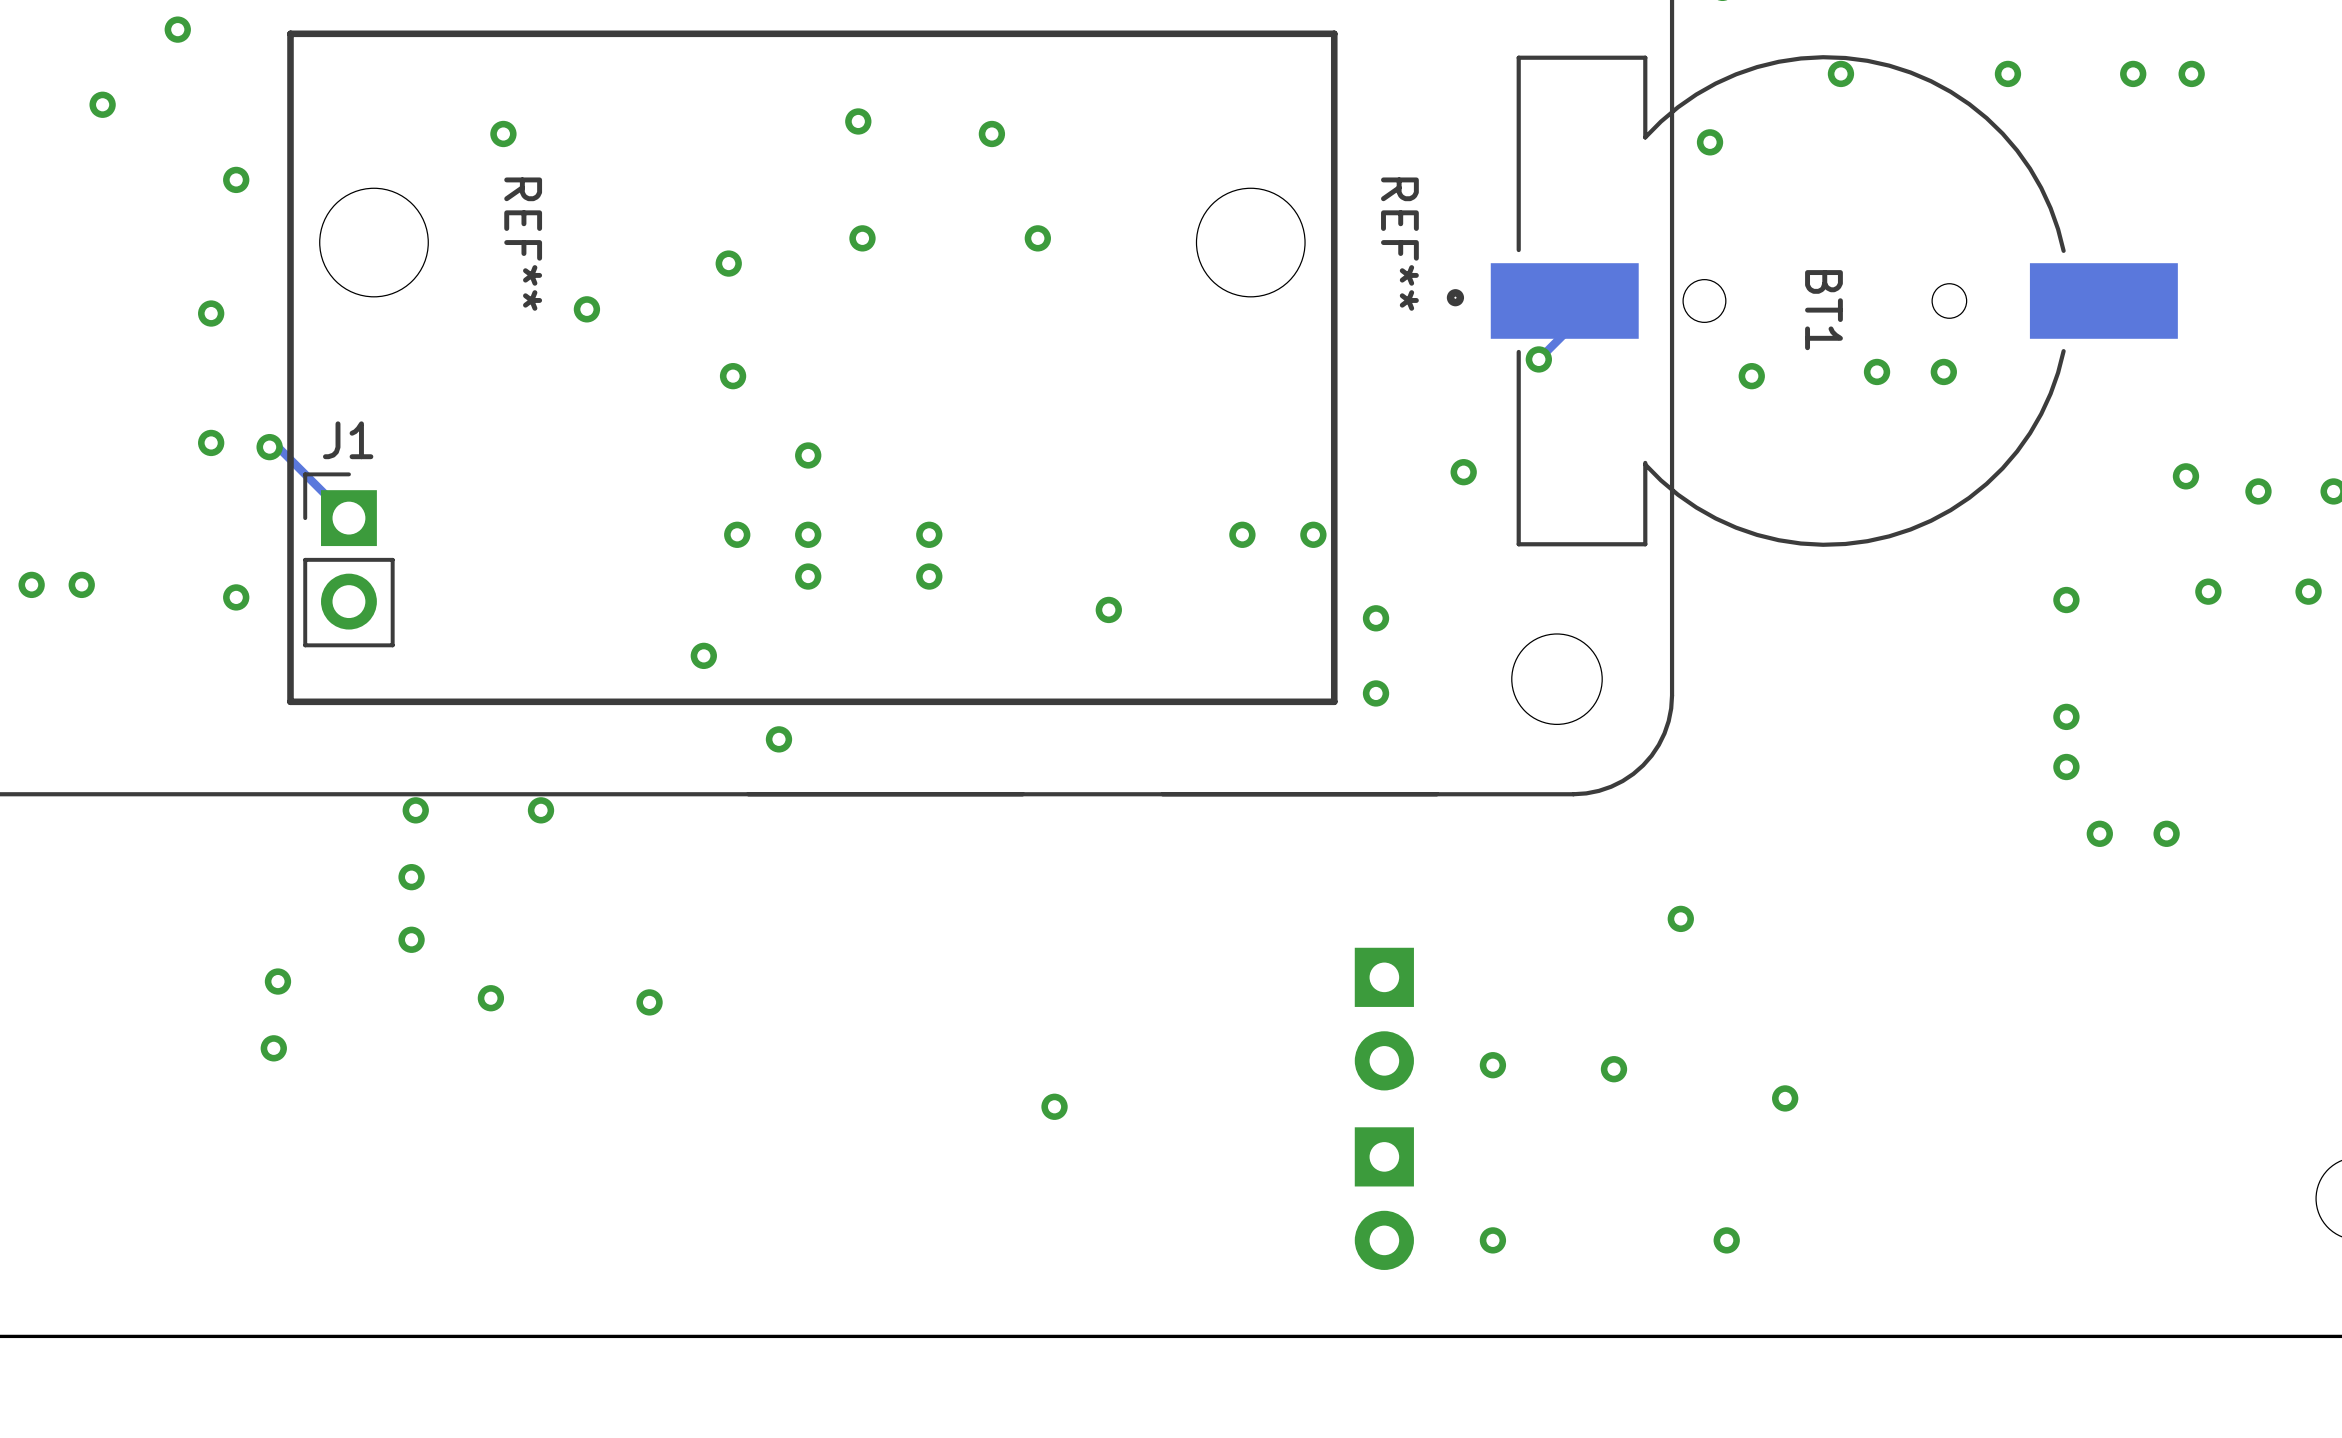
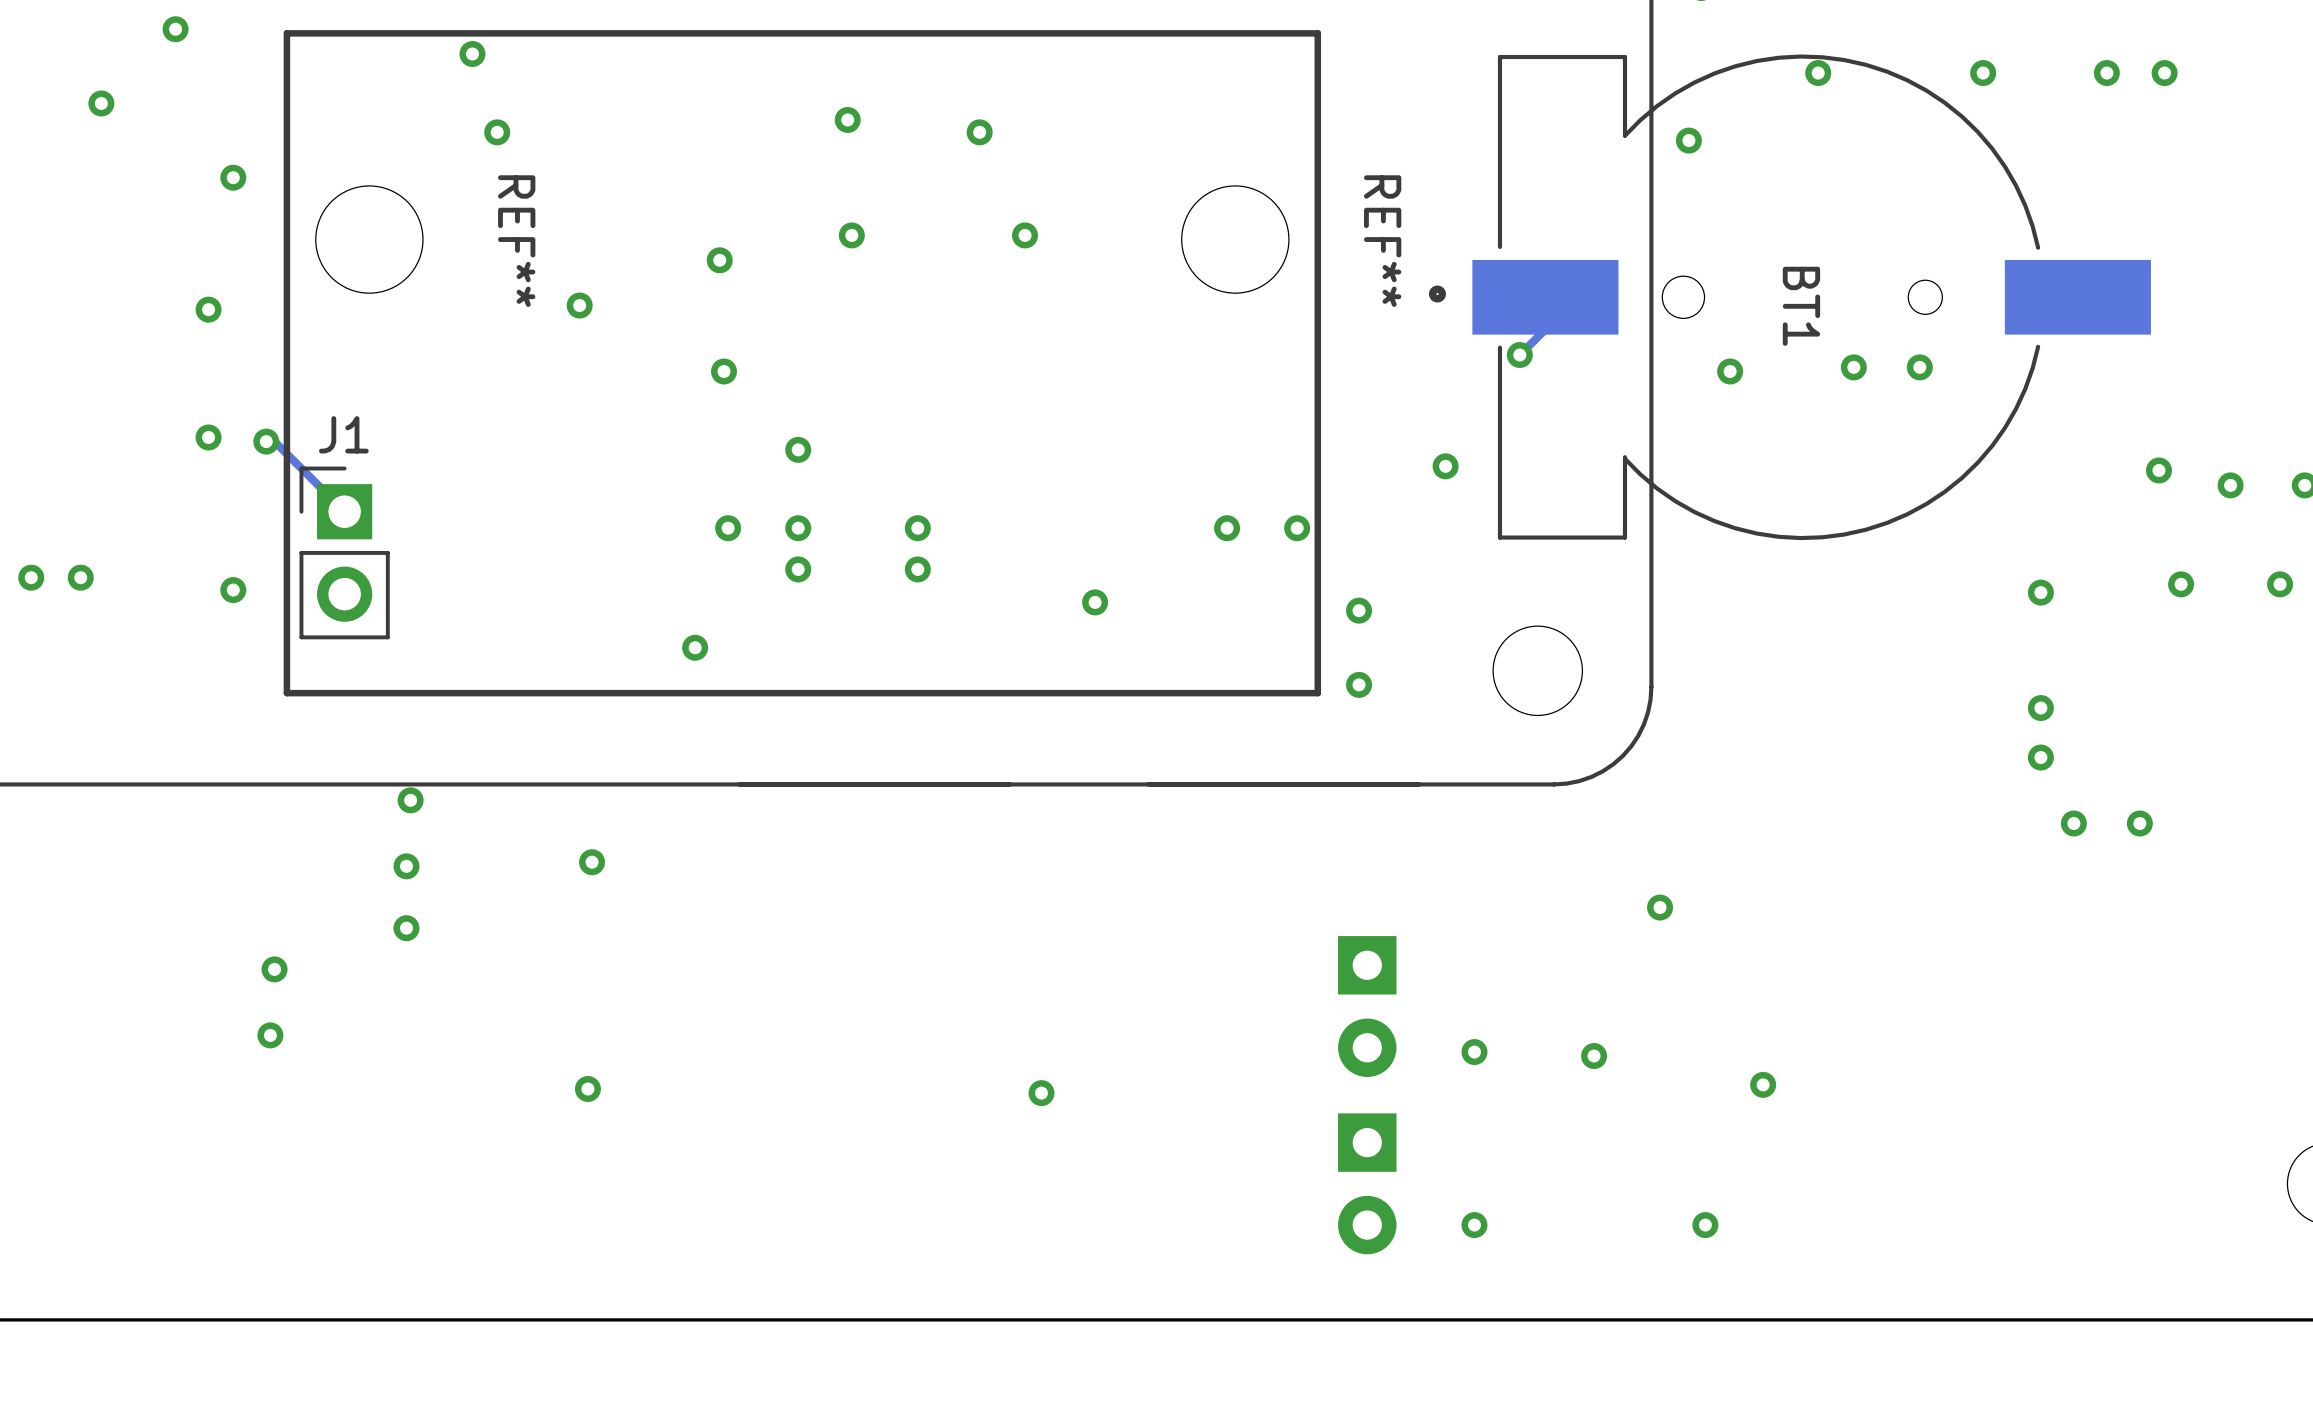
via: none -> (472, 53)
via: (778, 739) -> none
via: (541, 810) -> none
via: none -> (592, 862)
via: (490, 998) -> none
via: (649, 1002) -> none
via: none -> (587, 1088)

